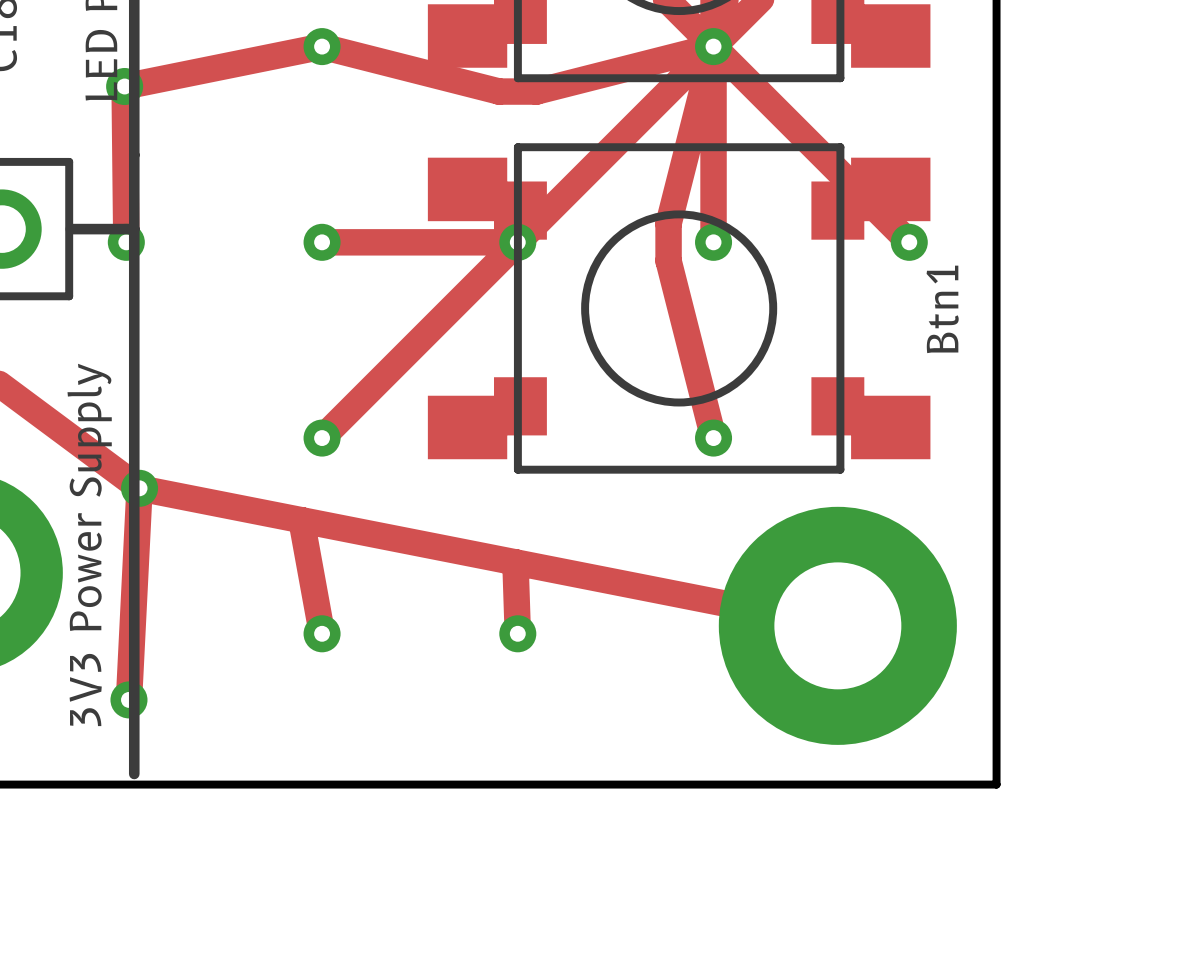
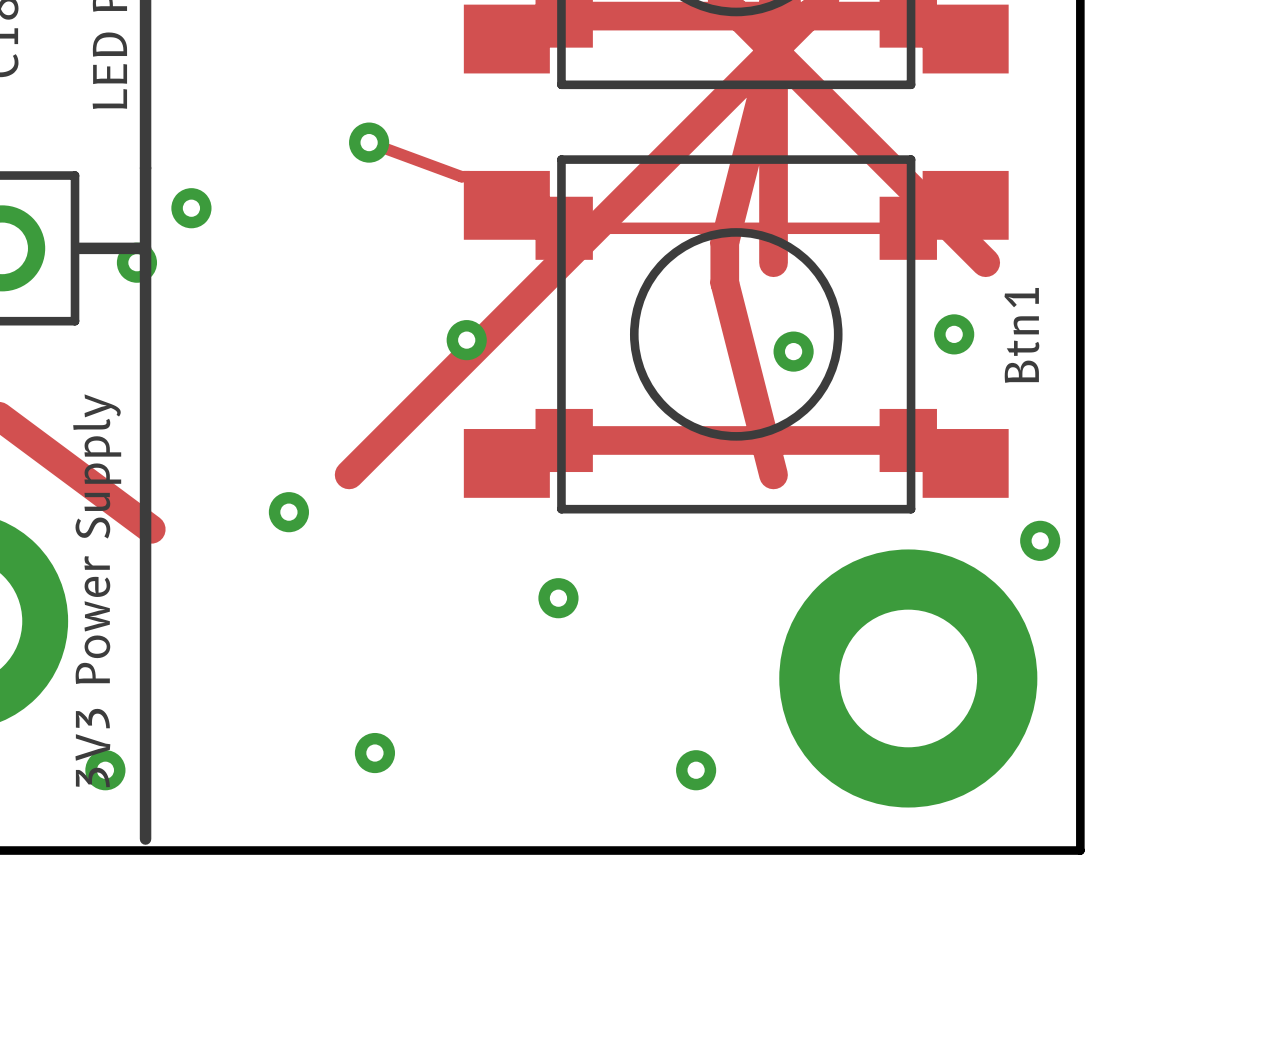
track: none -> (564, 16) (908, 16)
via: (322, 46) -> none
track: (713, 46) (536, 91) (499, 91) (322, 46) (124, 86) (126, 242) -> none
via: (713, 46) -> none
via: (124, 86) -> none
track: none -> (369, 142) (461, 176) (469, 176) (506, 205)
via: none -> (369, 142)
via: none -> (191, 208)
track: none -> (564, 228) (908, 228)
track: (322, 242) (517, 242) -> none
via: (322, 242) -> none
via: (517, 242) -> none
via: (713, 242) -> none
via position: (909, 242) -> (954, 334)
via: none -> (466, 340)
via: none -> (793, 351)
track: none -> (564, 440) (908, 440)
via: (322, 438) -> none
via: (713, 438) -> none
via: none -> (288, 512)
via: (139, 488) -> none
via: none -> (1040, 540)
track: (301, 520) (139, 488) (128, 699) -> none
track: (301, 520) (322, 633) -> none
track: (301, 520) (837, 625) -> none
via: none -> (558, 598)
track: (515, 562) (517, 633) -> none
via position: (322, 633) -> (374, 753)
via: (517, 633) -> none
via position: (128, 699) -> (105, 770)
via: none -> (696, 770)

